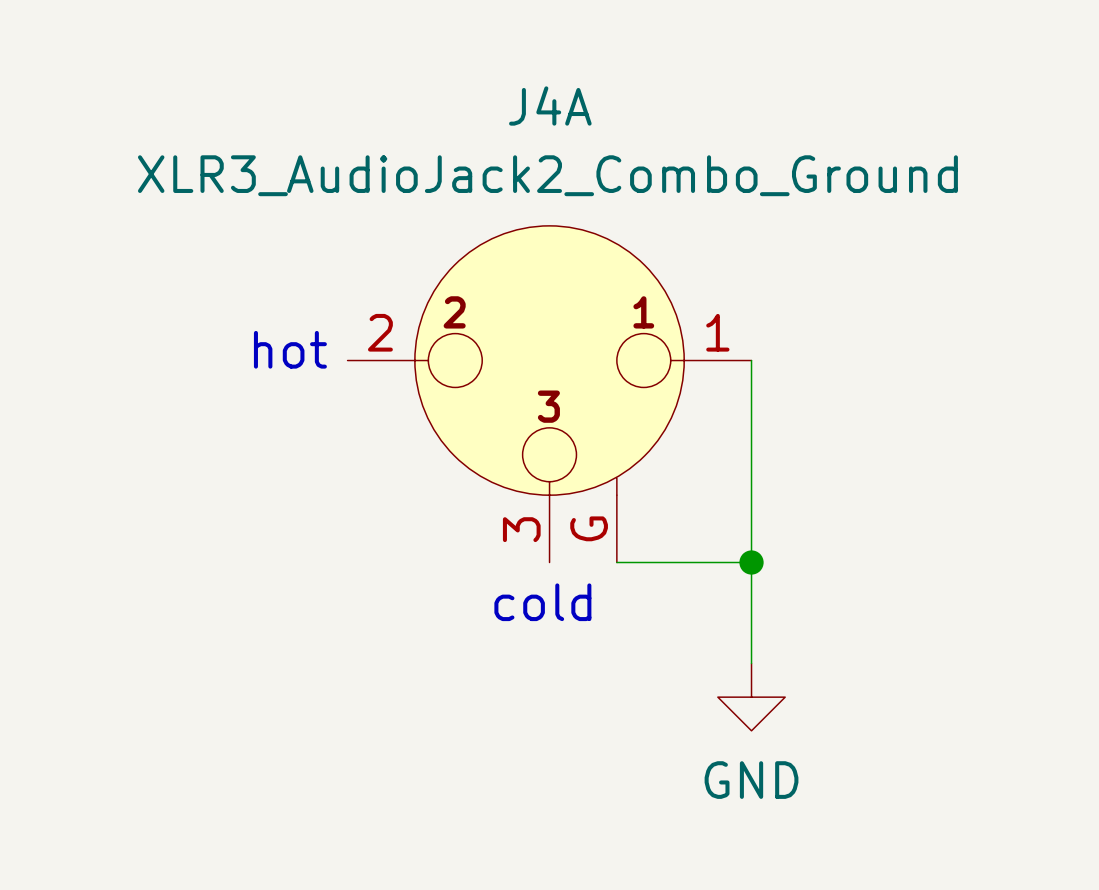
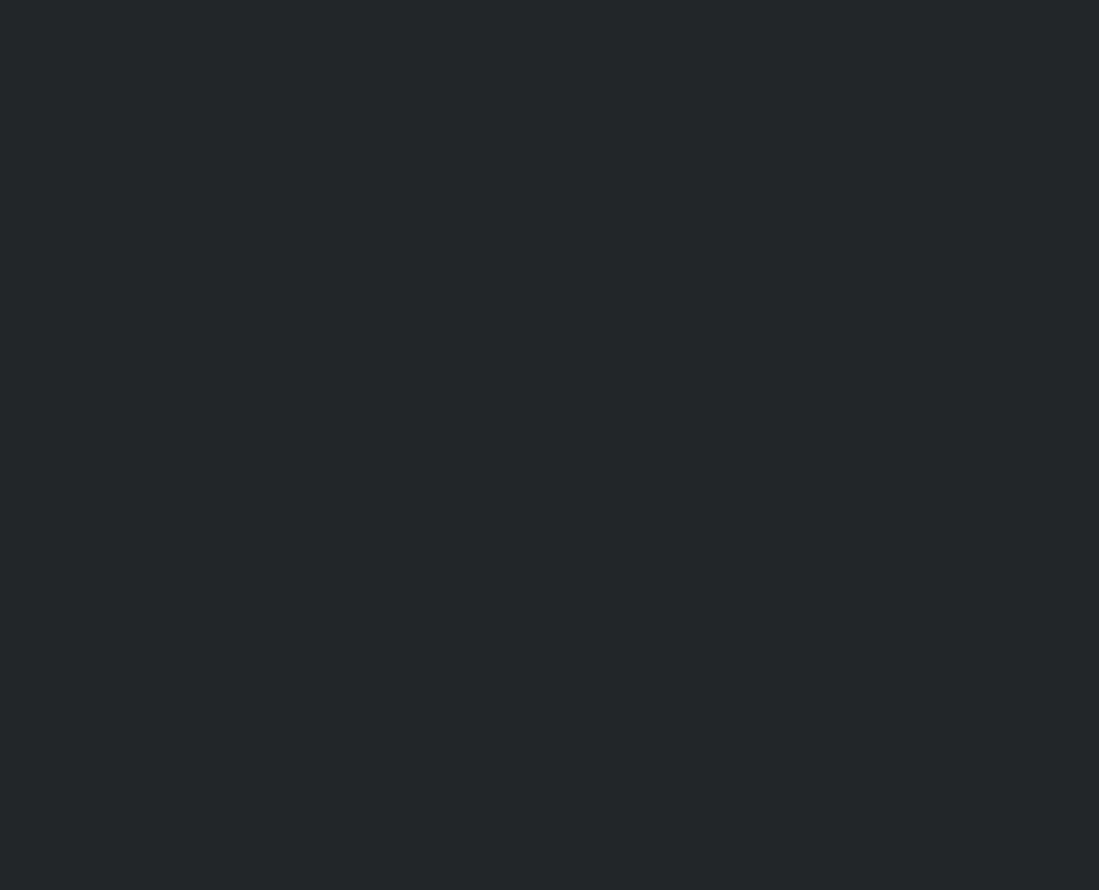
text: hot (290, 349) -> none
wire: (751, 360) (751, 663) -> none
J4A: XLR3_AudioJack2_Combo_Ground (549, 394) -> none
wire: (616, 562) (751, 562) -> none
junction: (751, 562) -> none
text: cold (542, 602) -> none
power symbol: GND (751, 697) -> none

